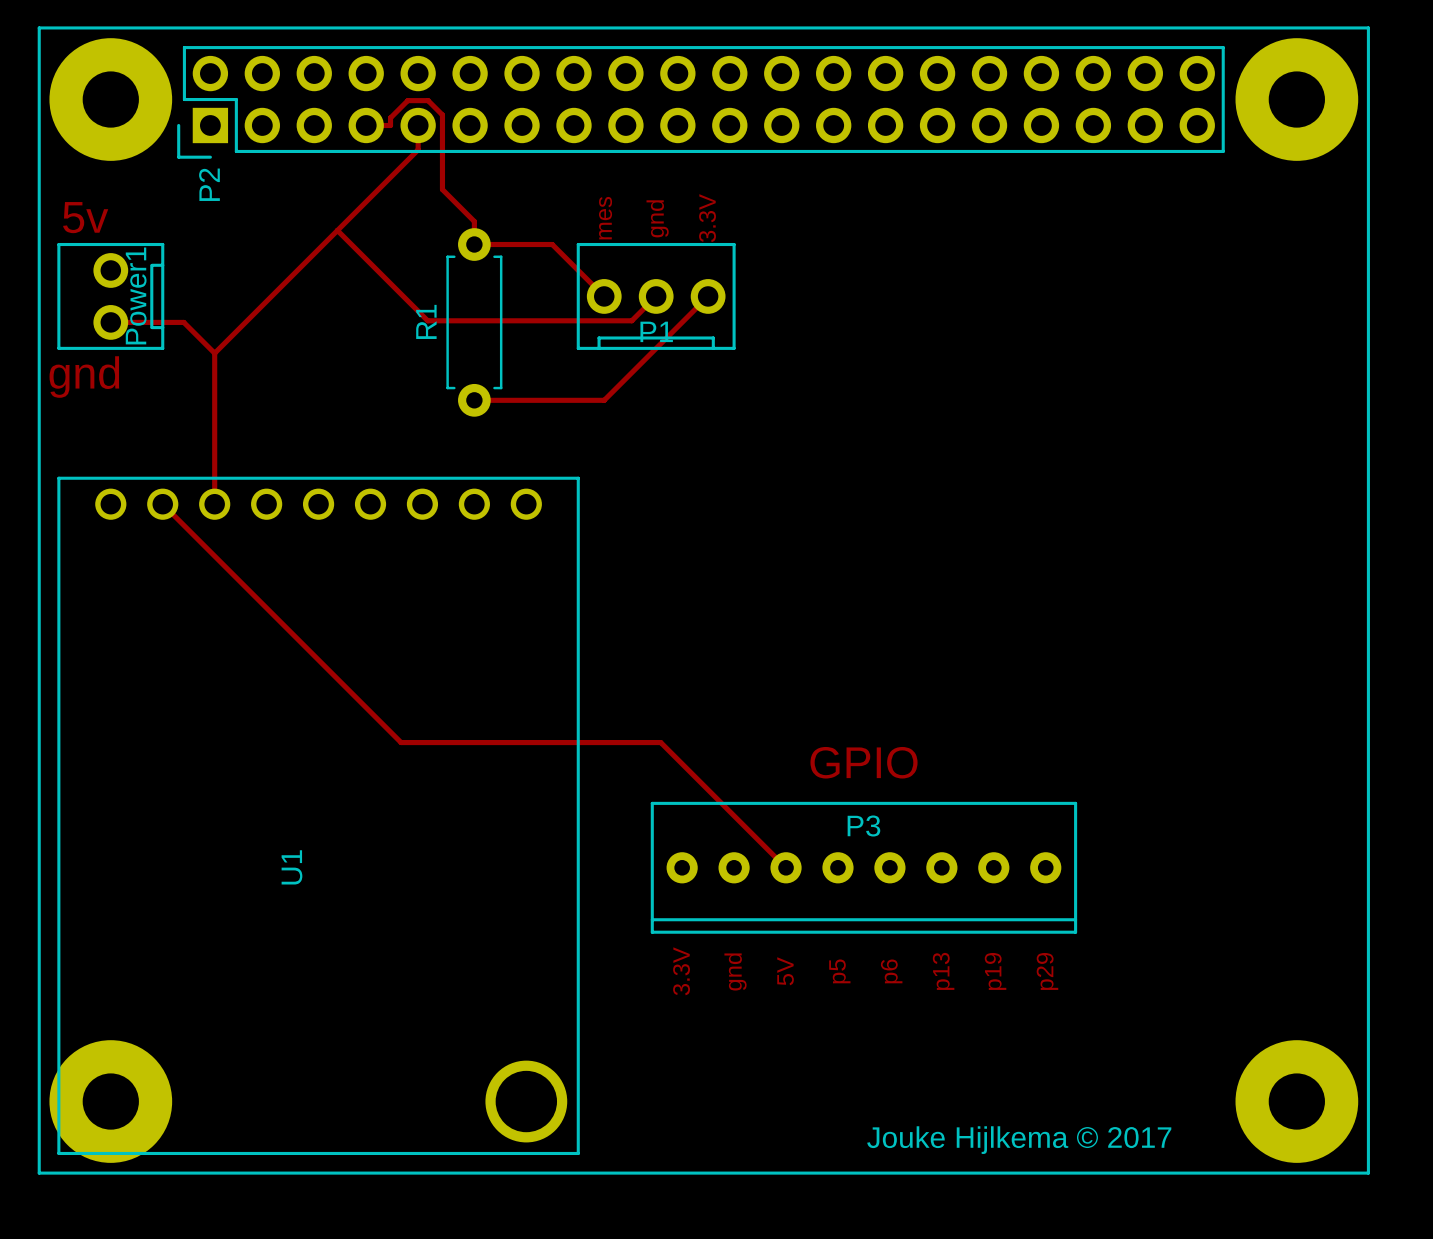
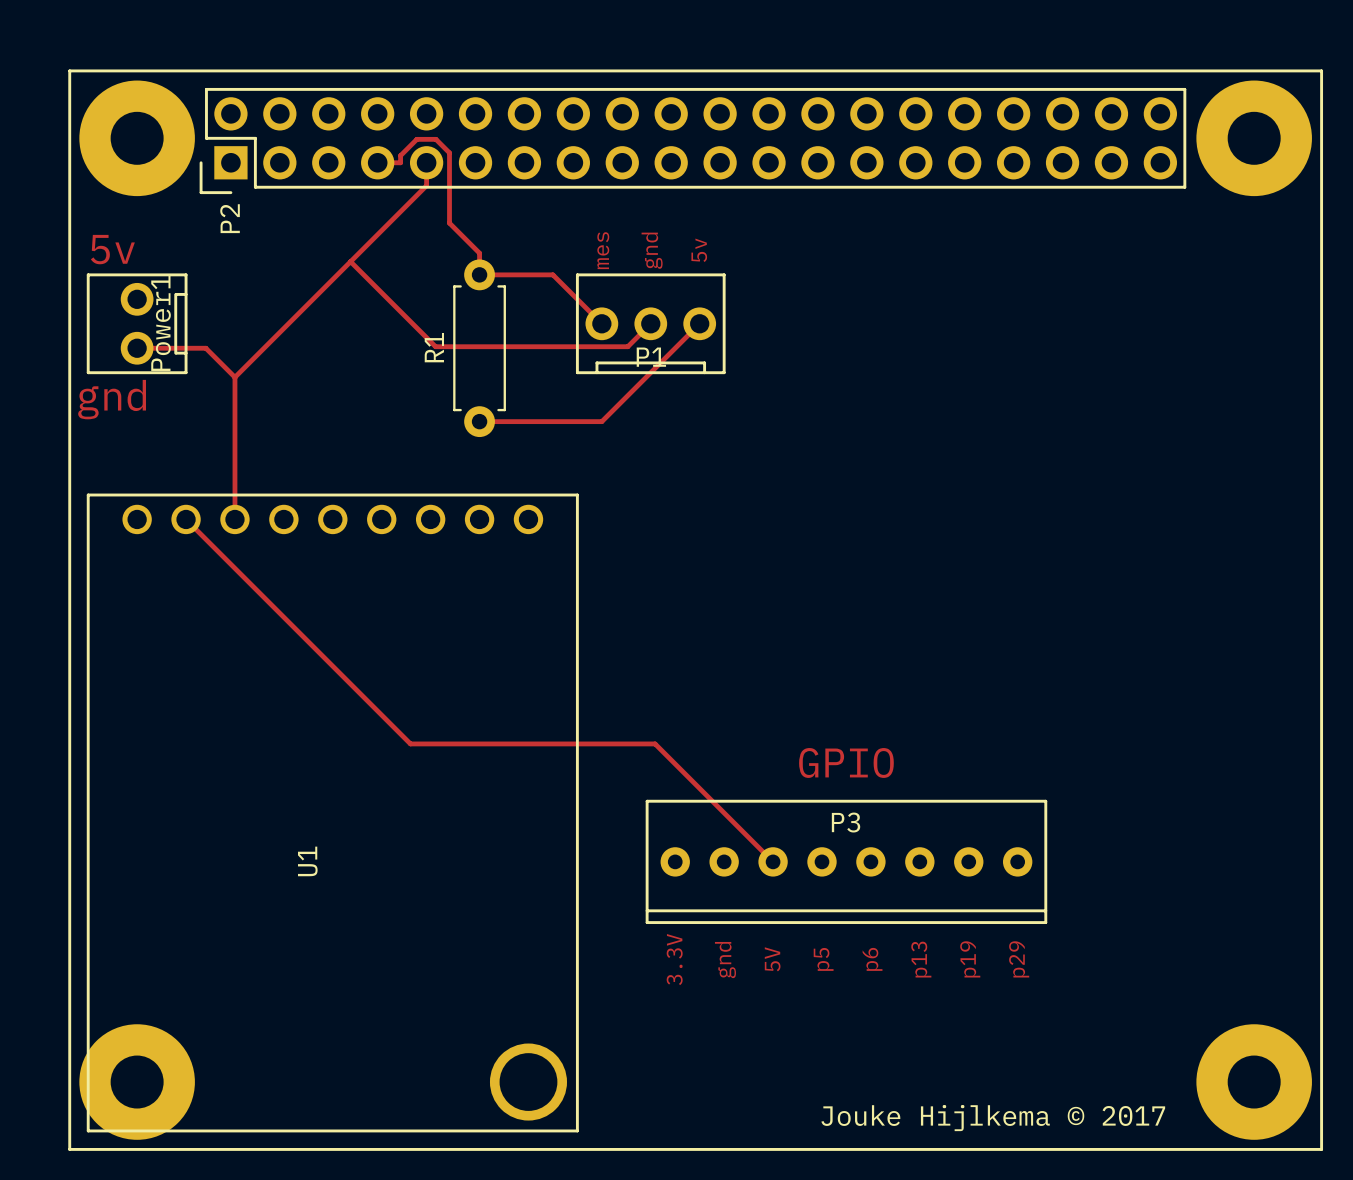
text: 3.3V (707, 218) -> 5v (699, 250)

